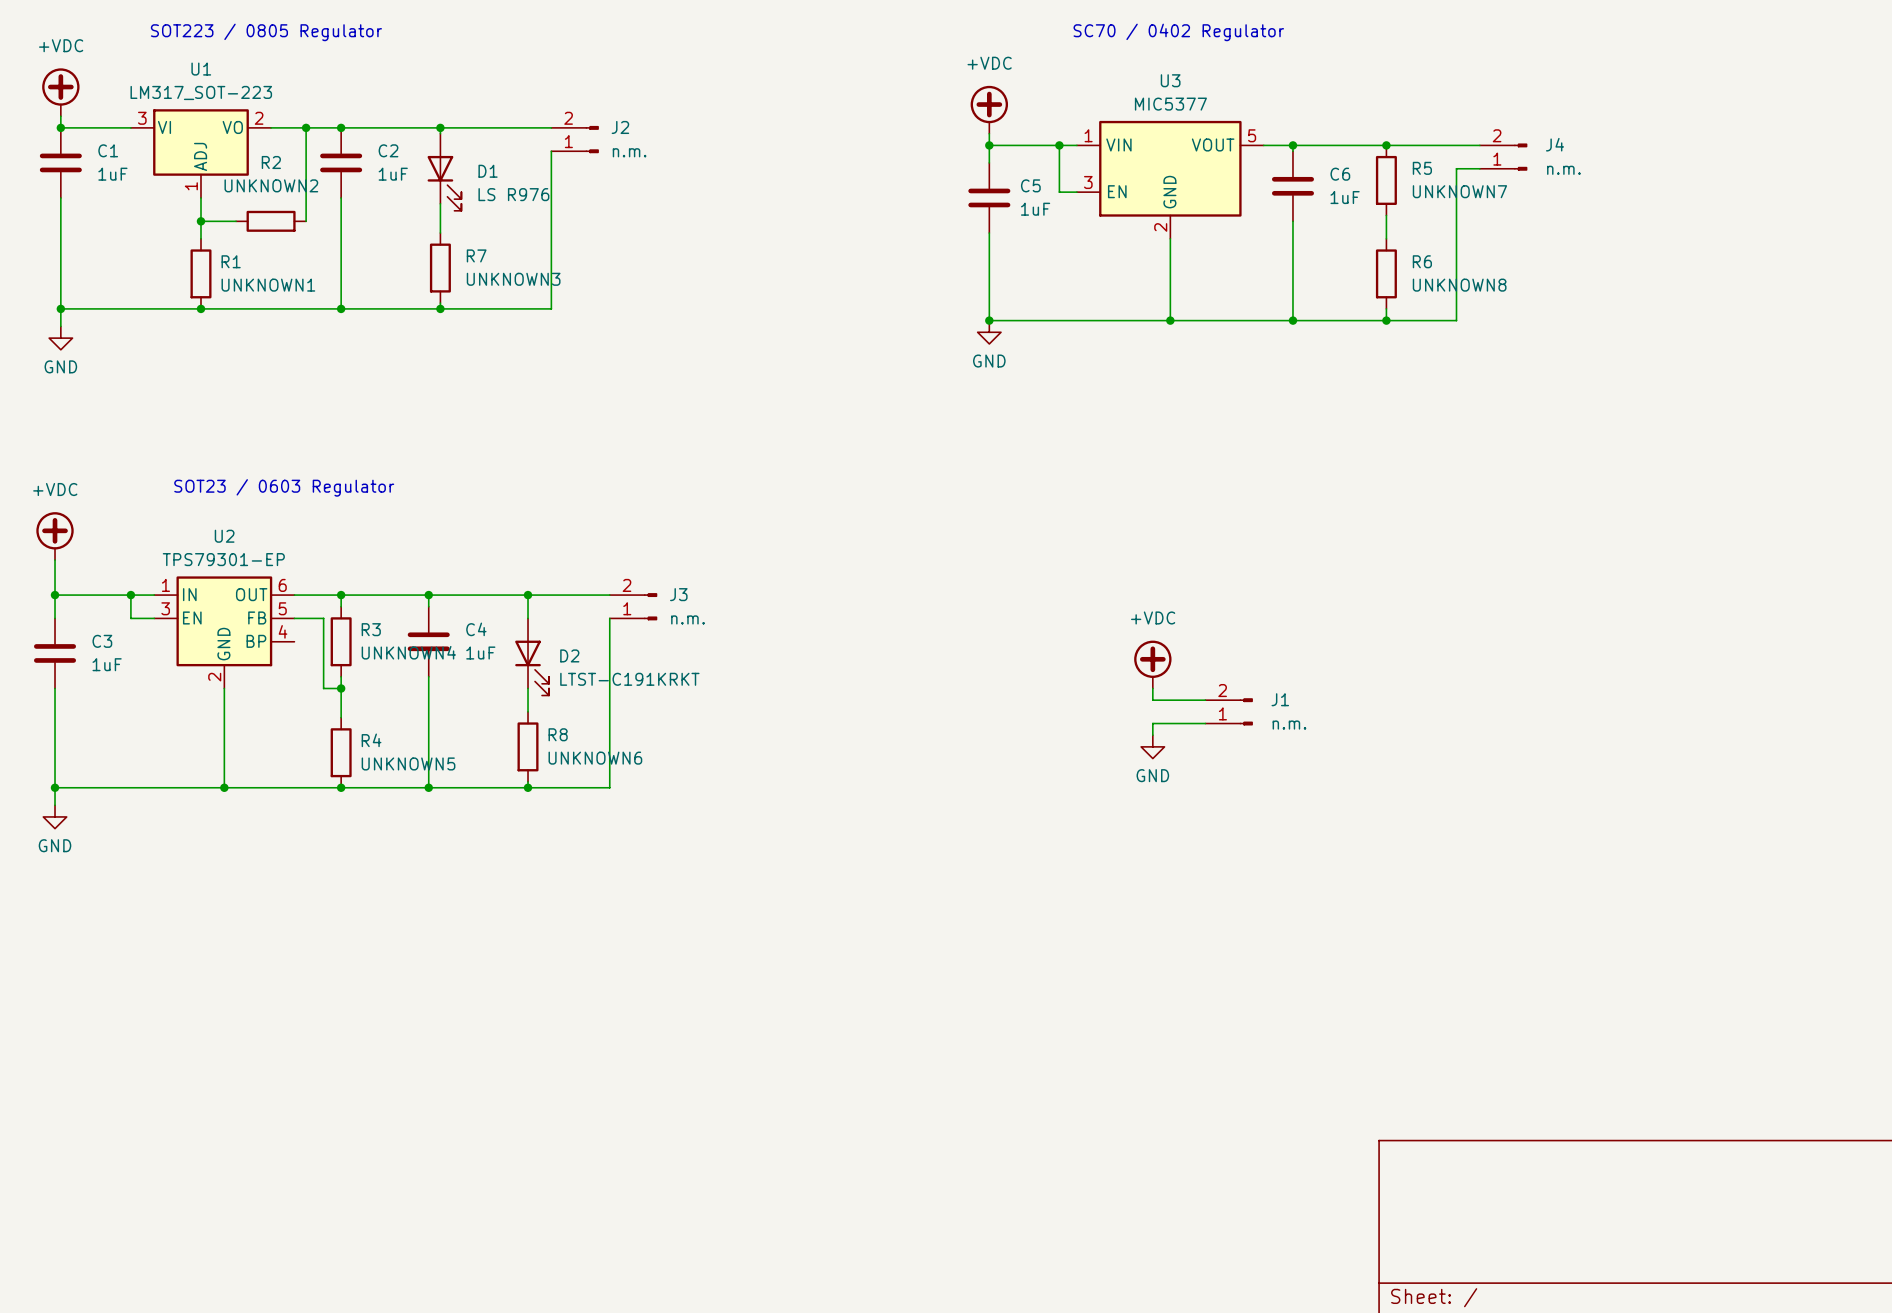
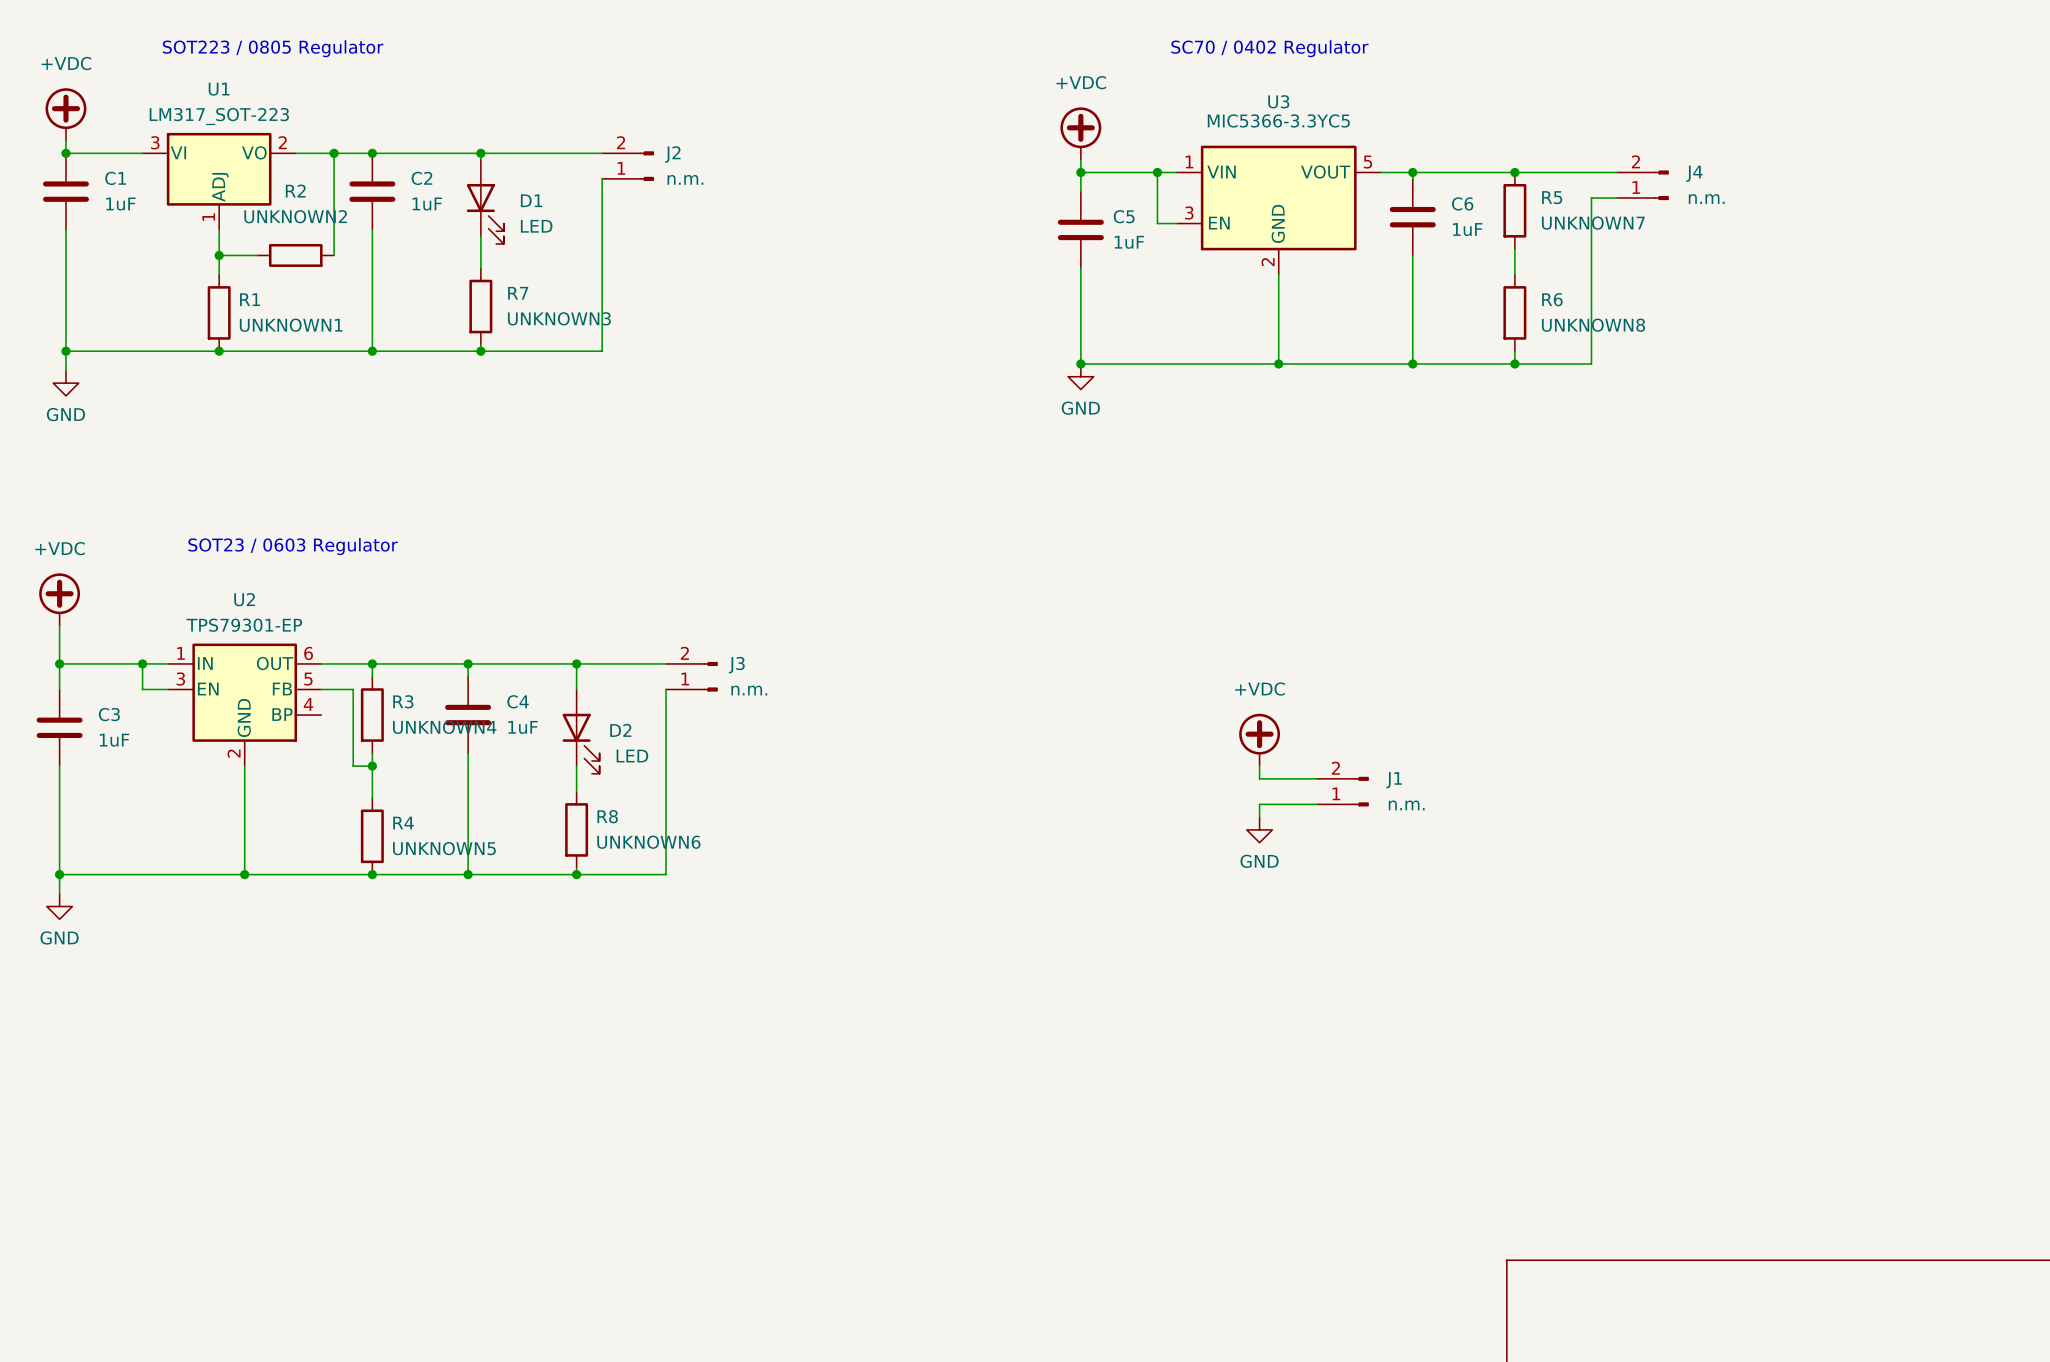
U3 value: MIC5377 (1170, 104) -> MIC5366-3.3YC5 (1278, 120)
D1 value: LS R976 (513, 194) -> LED (536, 226)
D2 value: LTST-C191KRKT (629, 679) -> LED (632, 756)

